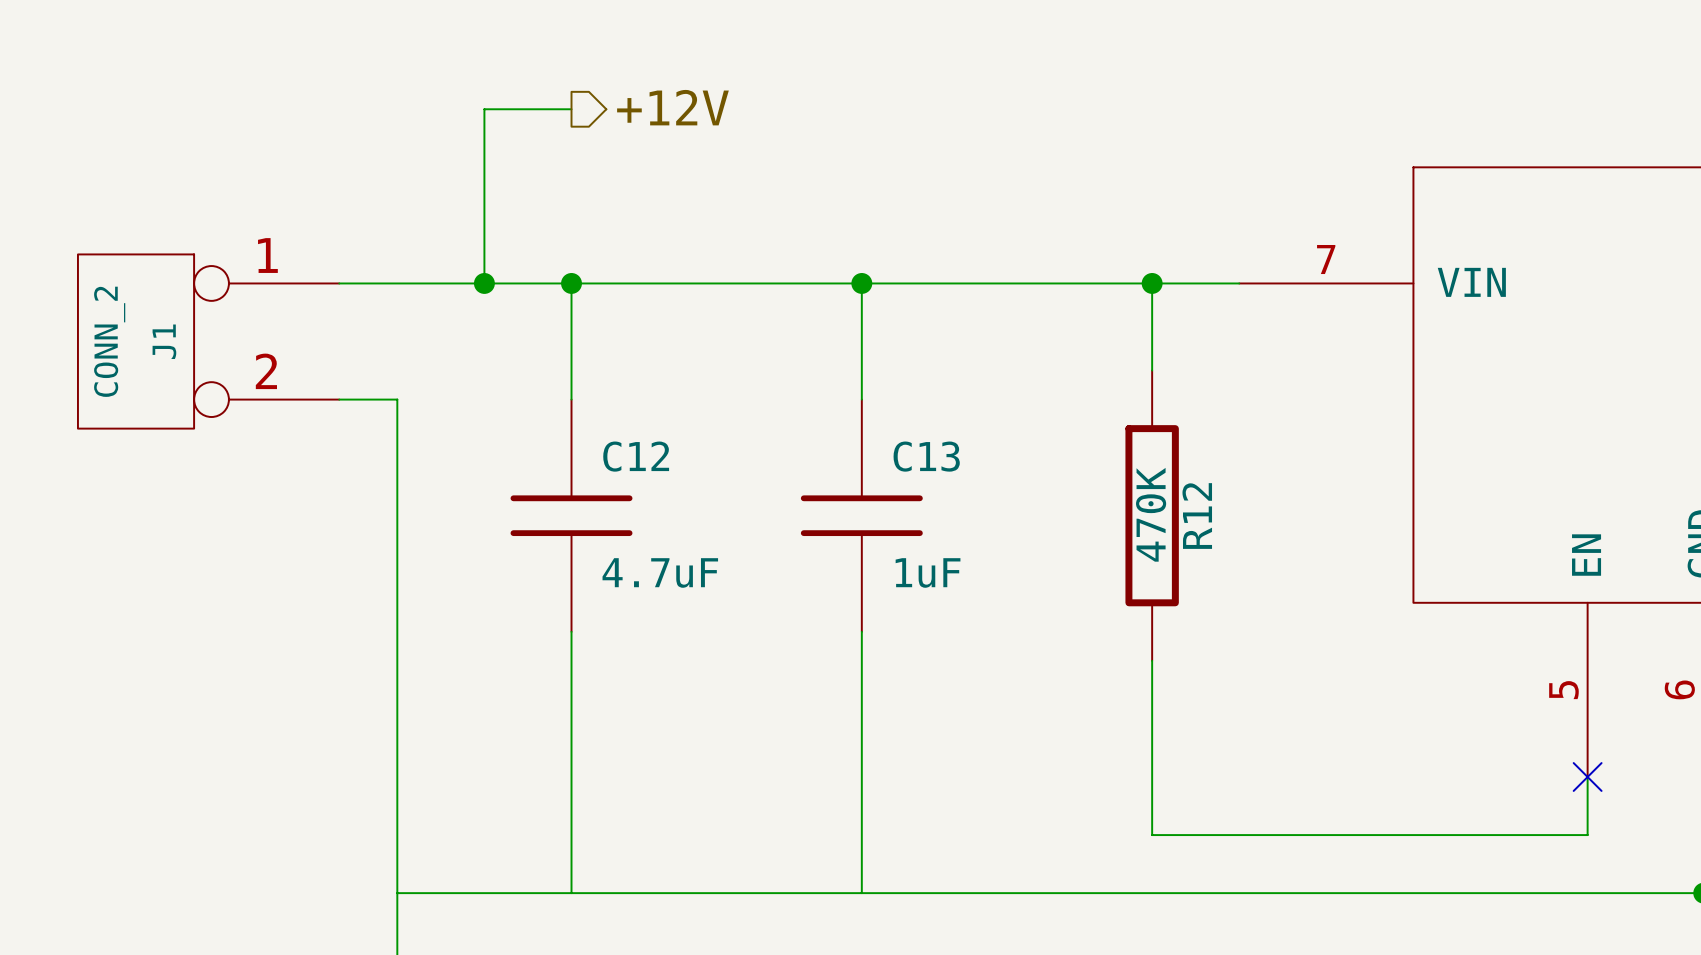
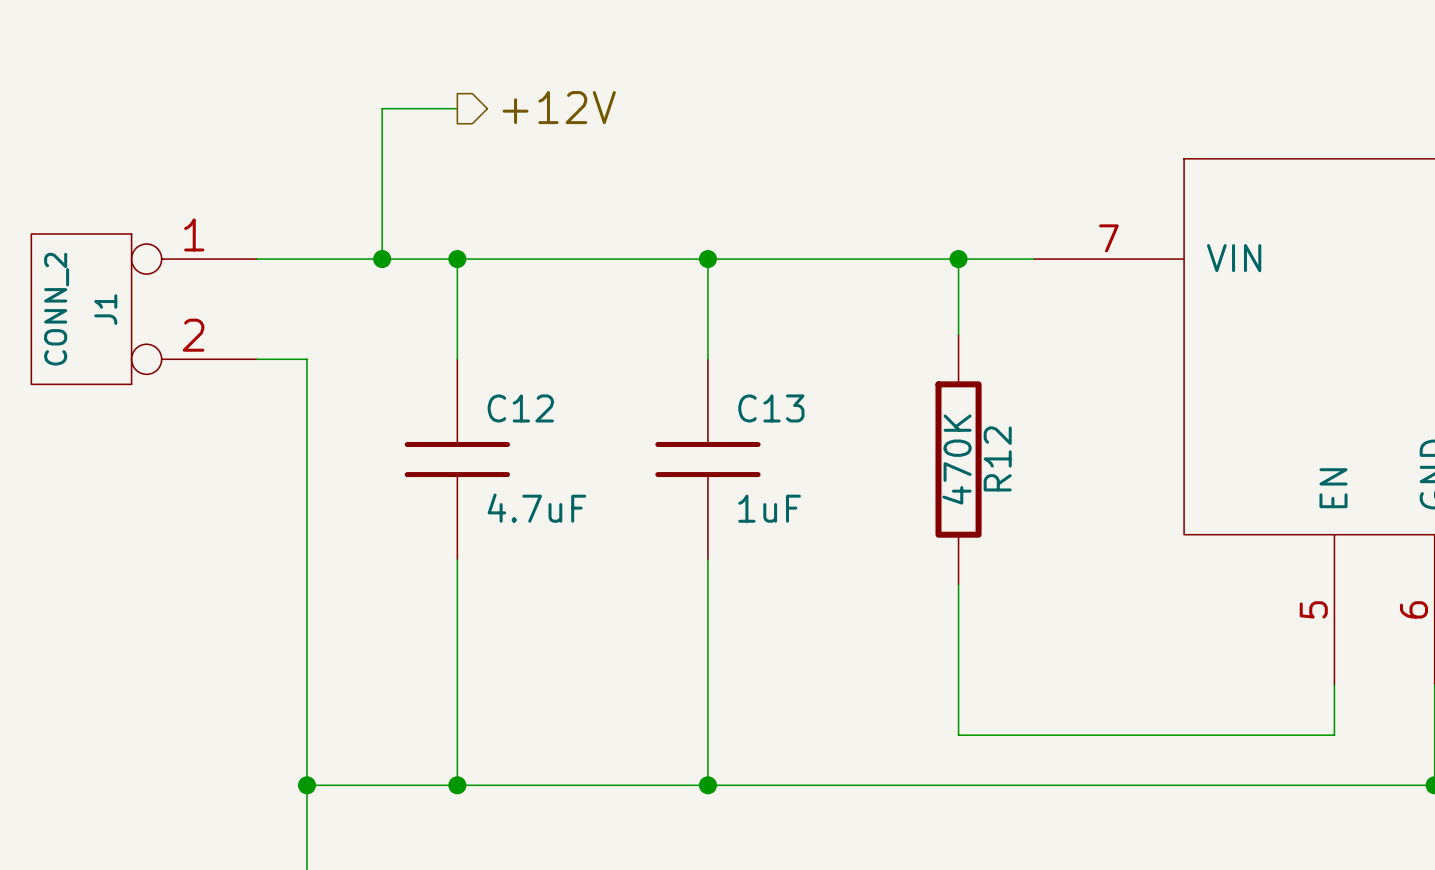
no-connect mark: (1587, 777) -> none
junction: none -> (307, 785)
junction: none -> (457, 785)
junction: none -> (707, 785)

